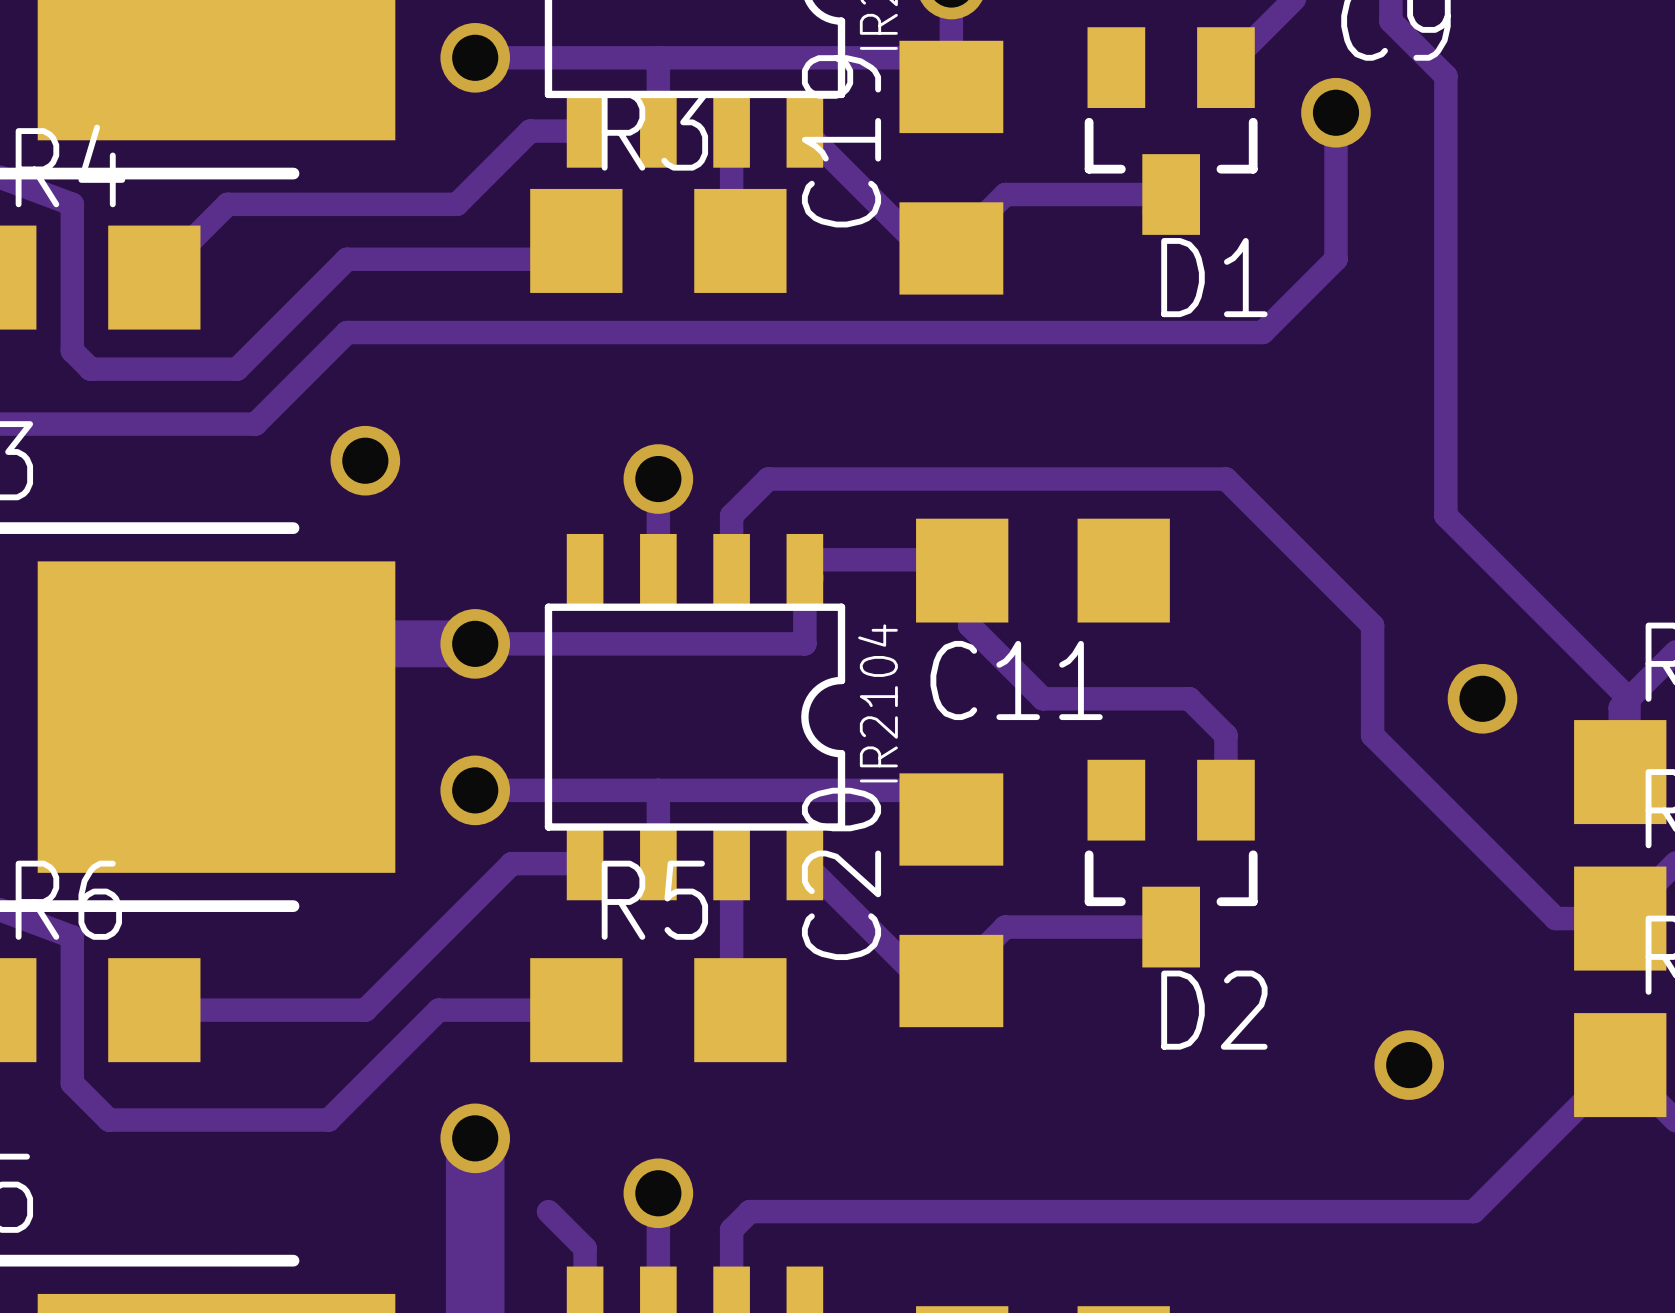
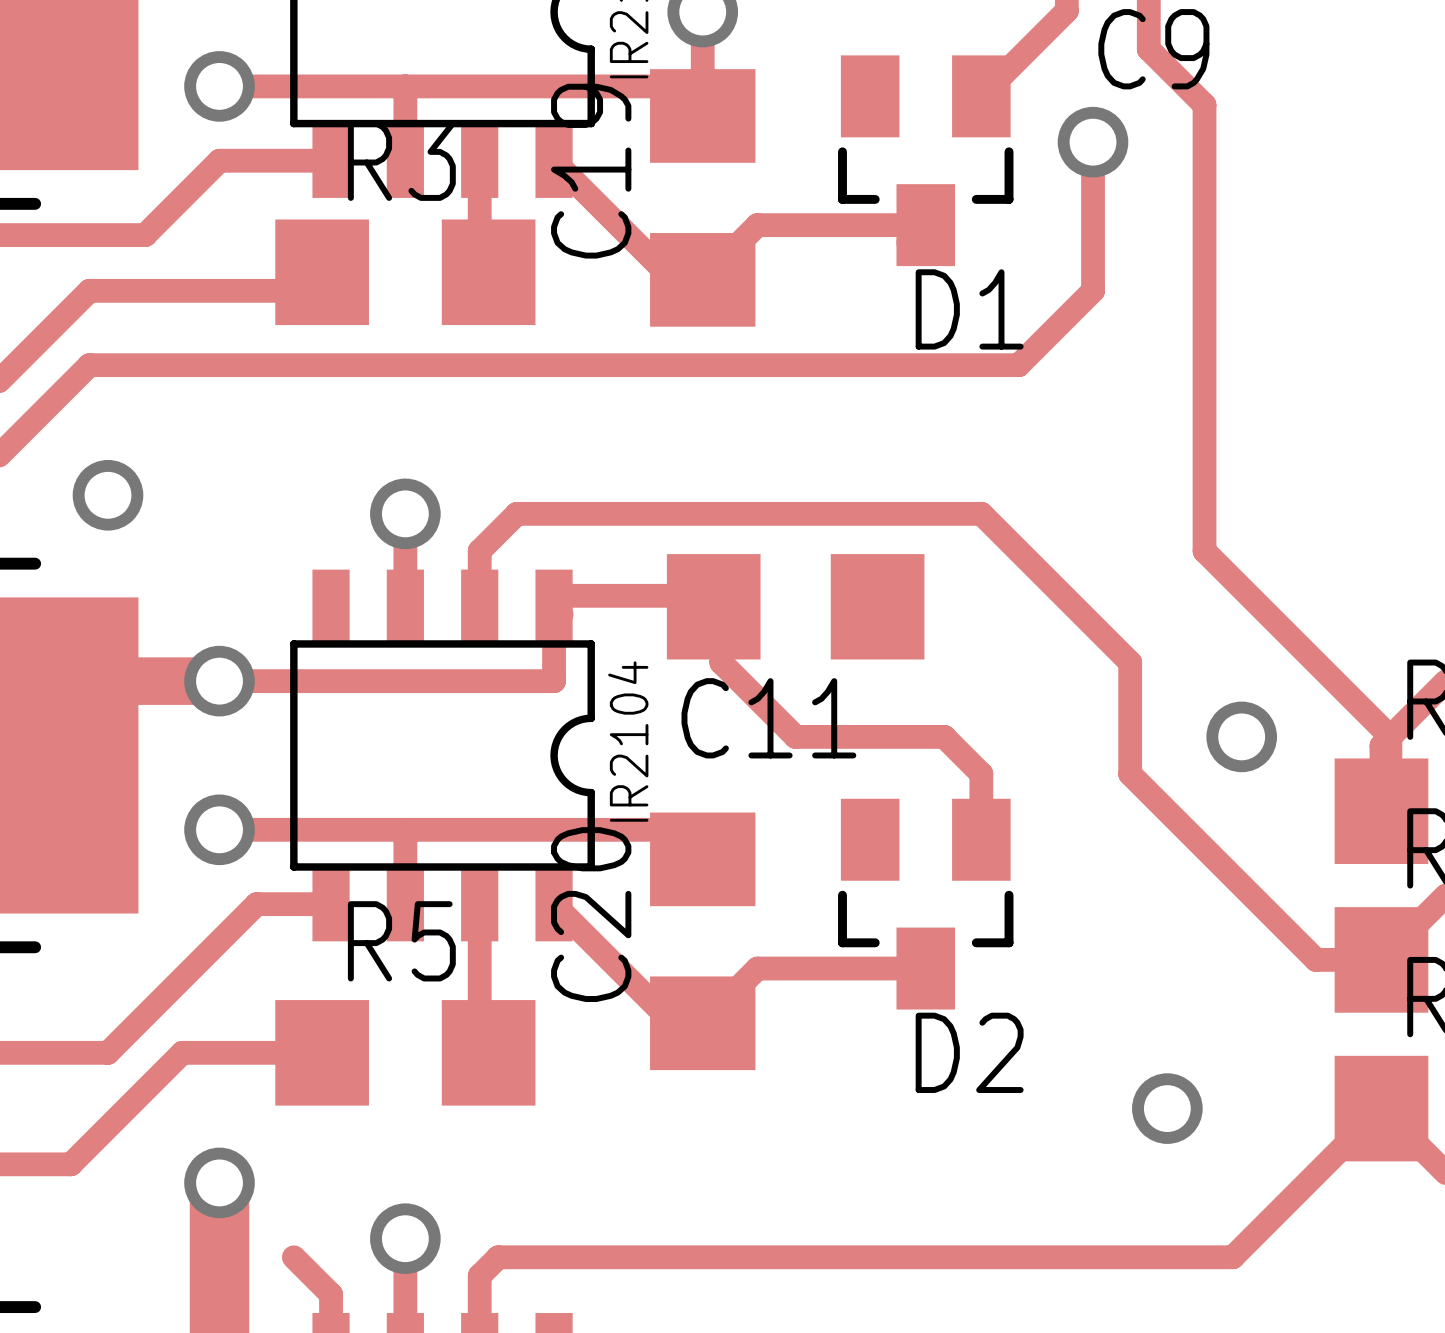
track: (530, 131) (456, 204) (401, 204) -> (275, 160) (219, 160) (145, 235)

